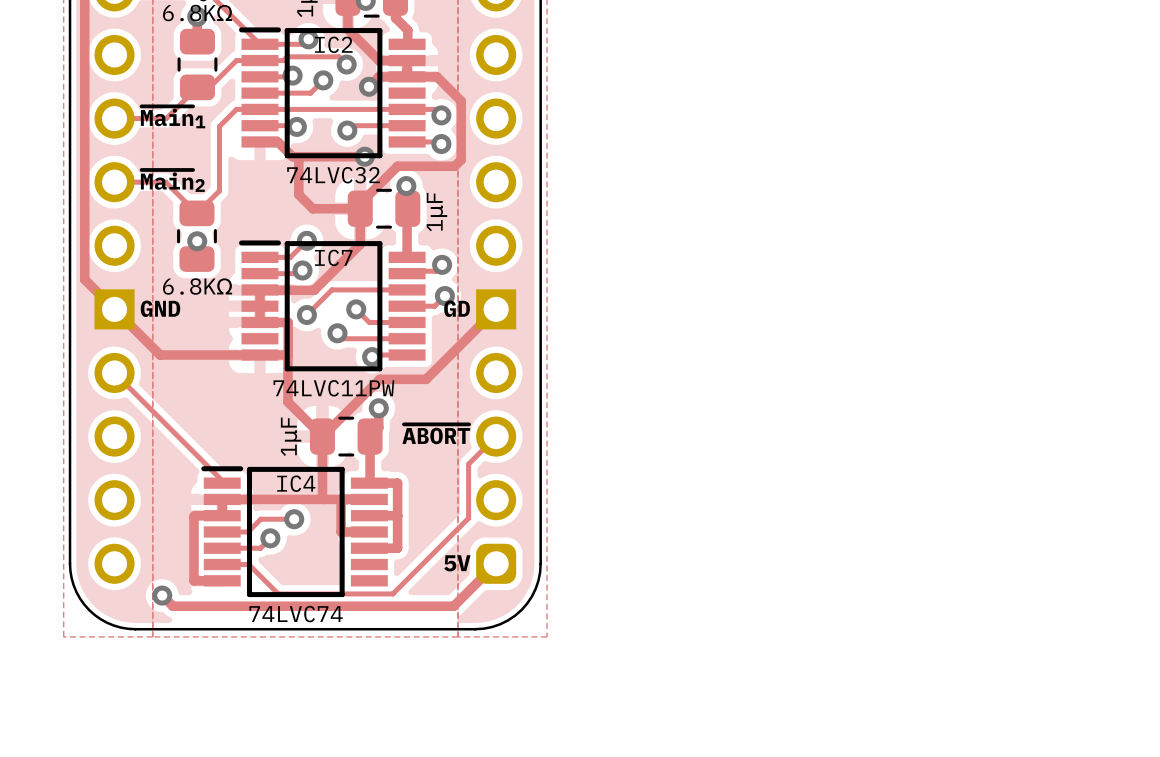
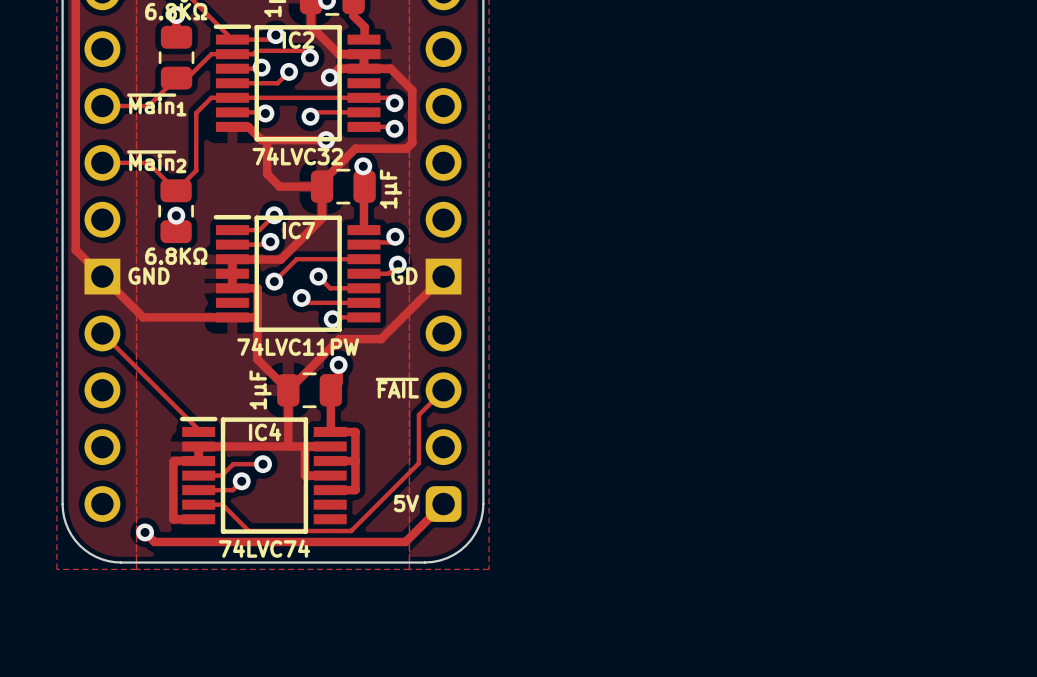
text: ~{ABORT} (436, 434) -> ~{FAIL} (397, 388)

